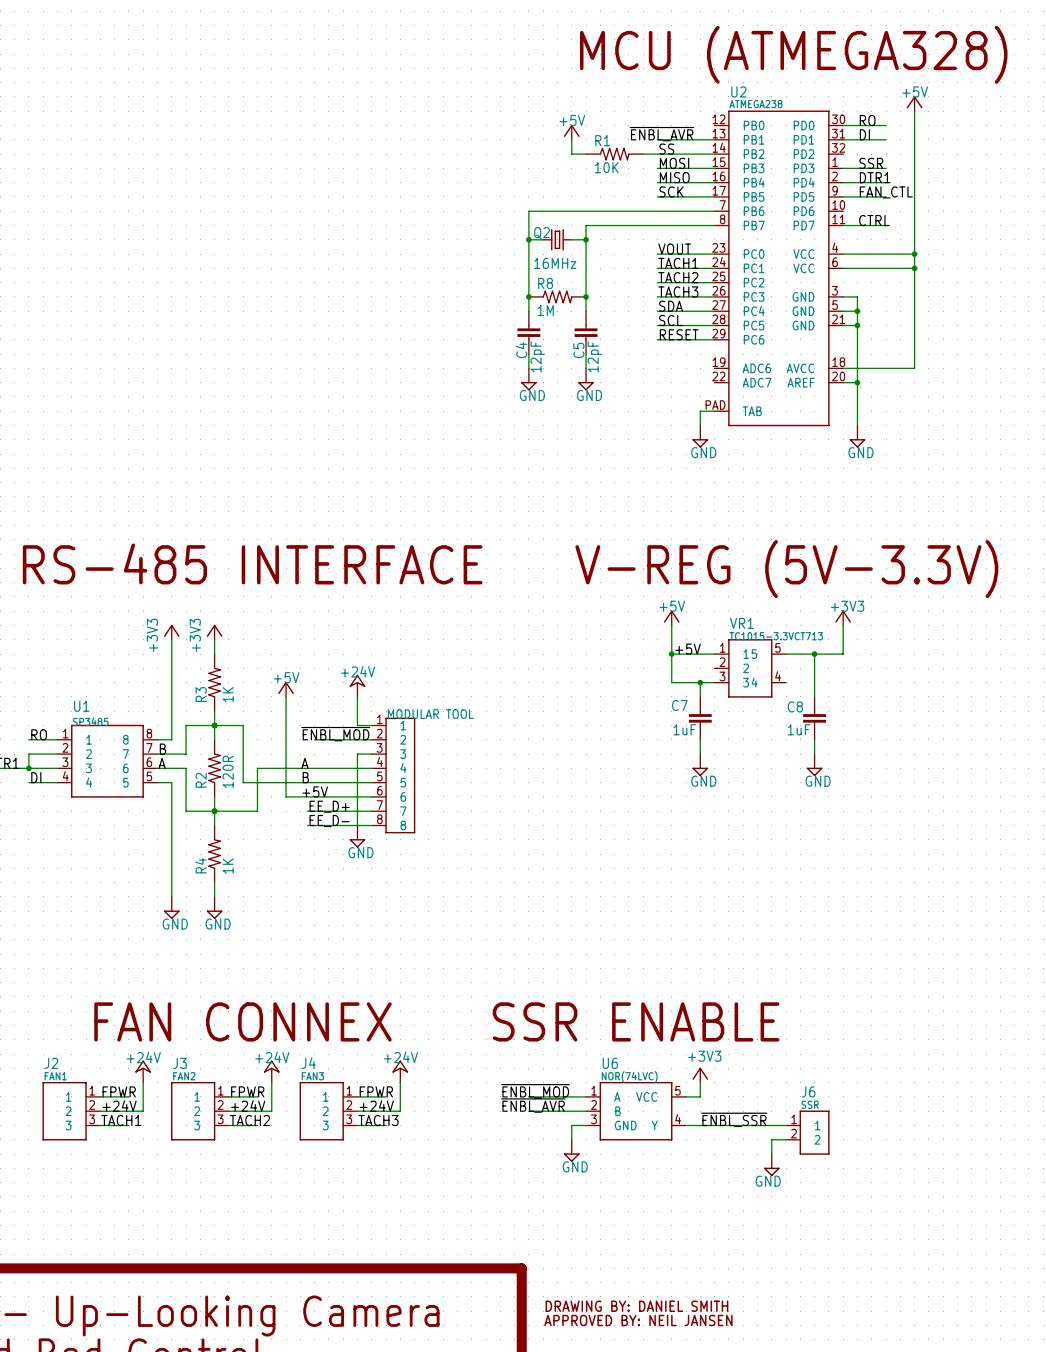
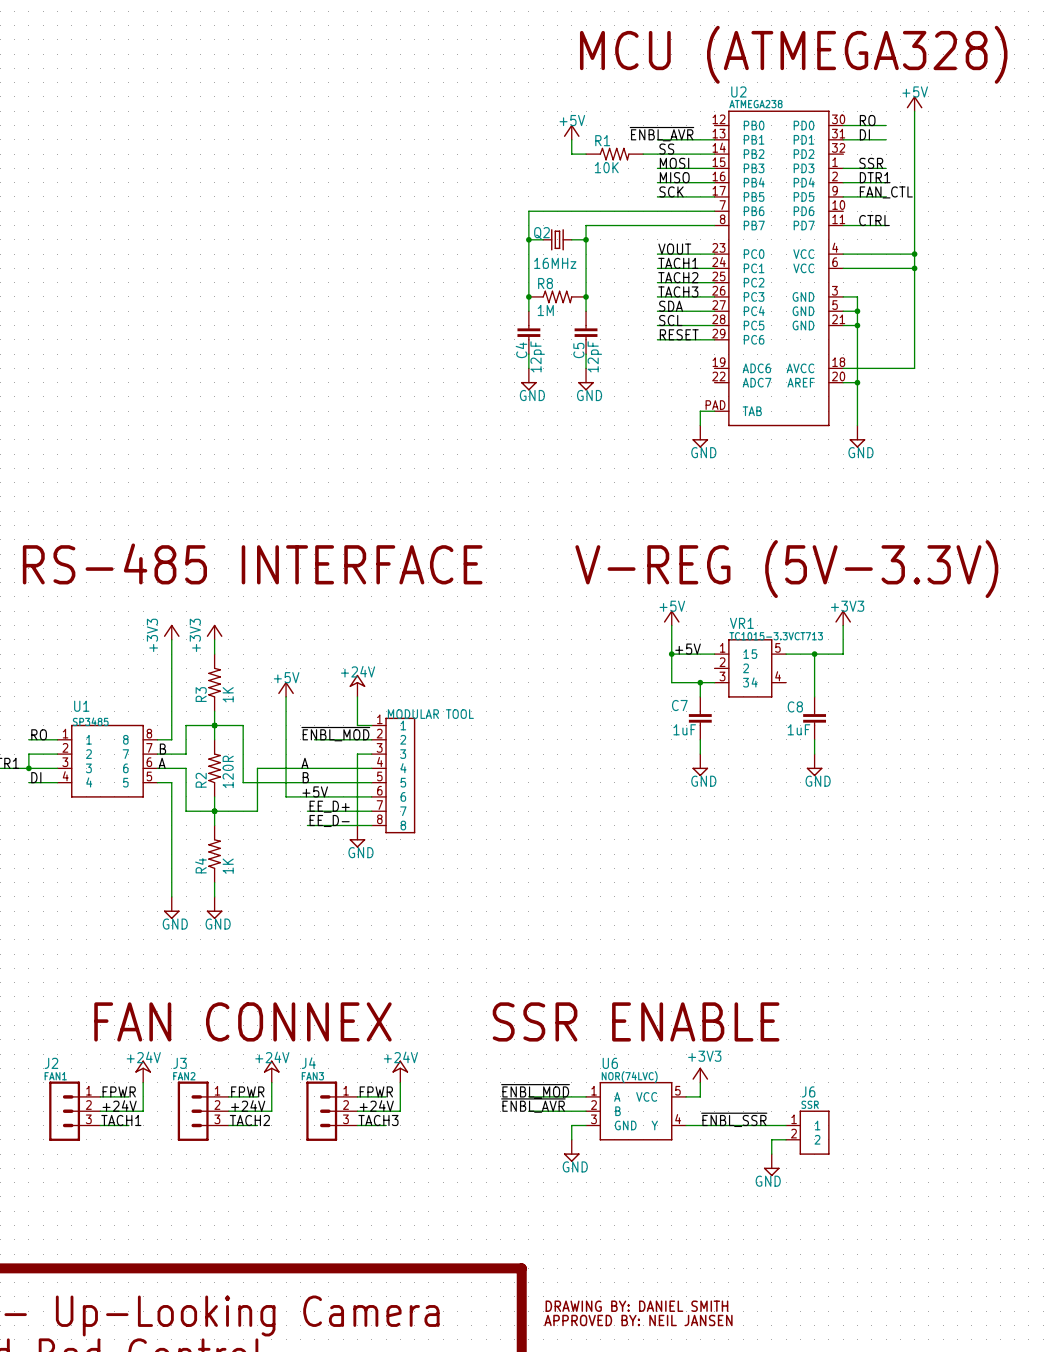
J2 symbol: [42, 1081, 101, 1141] -> [49, 1081, 101, 1141]
J3 symbol: [171, 1081, 229, 1141] -> [177, 1081, 229, 1141]
J4 symbol: [299, 1081, 358, 1141] -> [306, 1081, 358, 1141]

